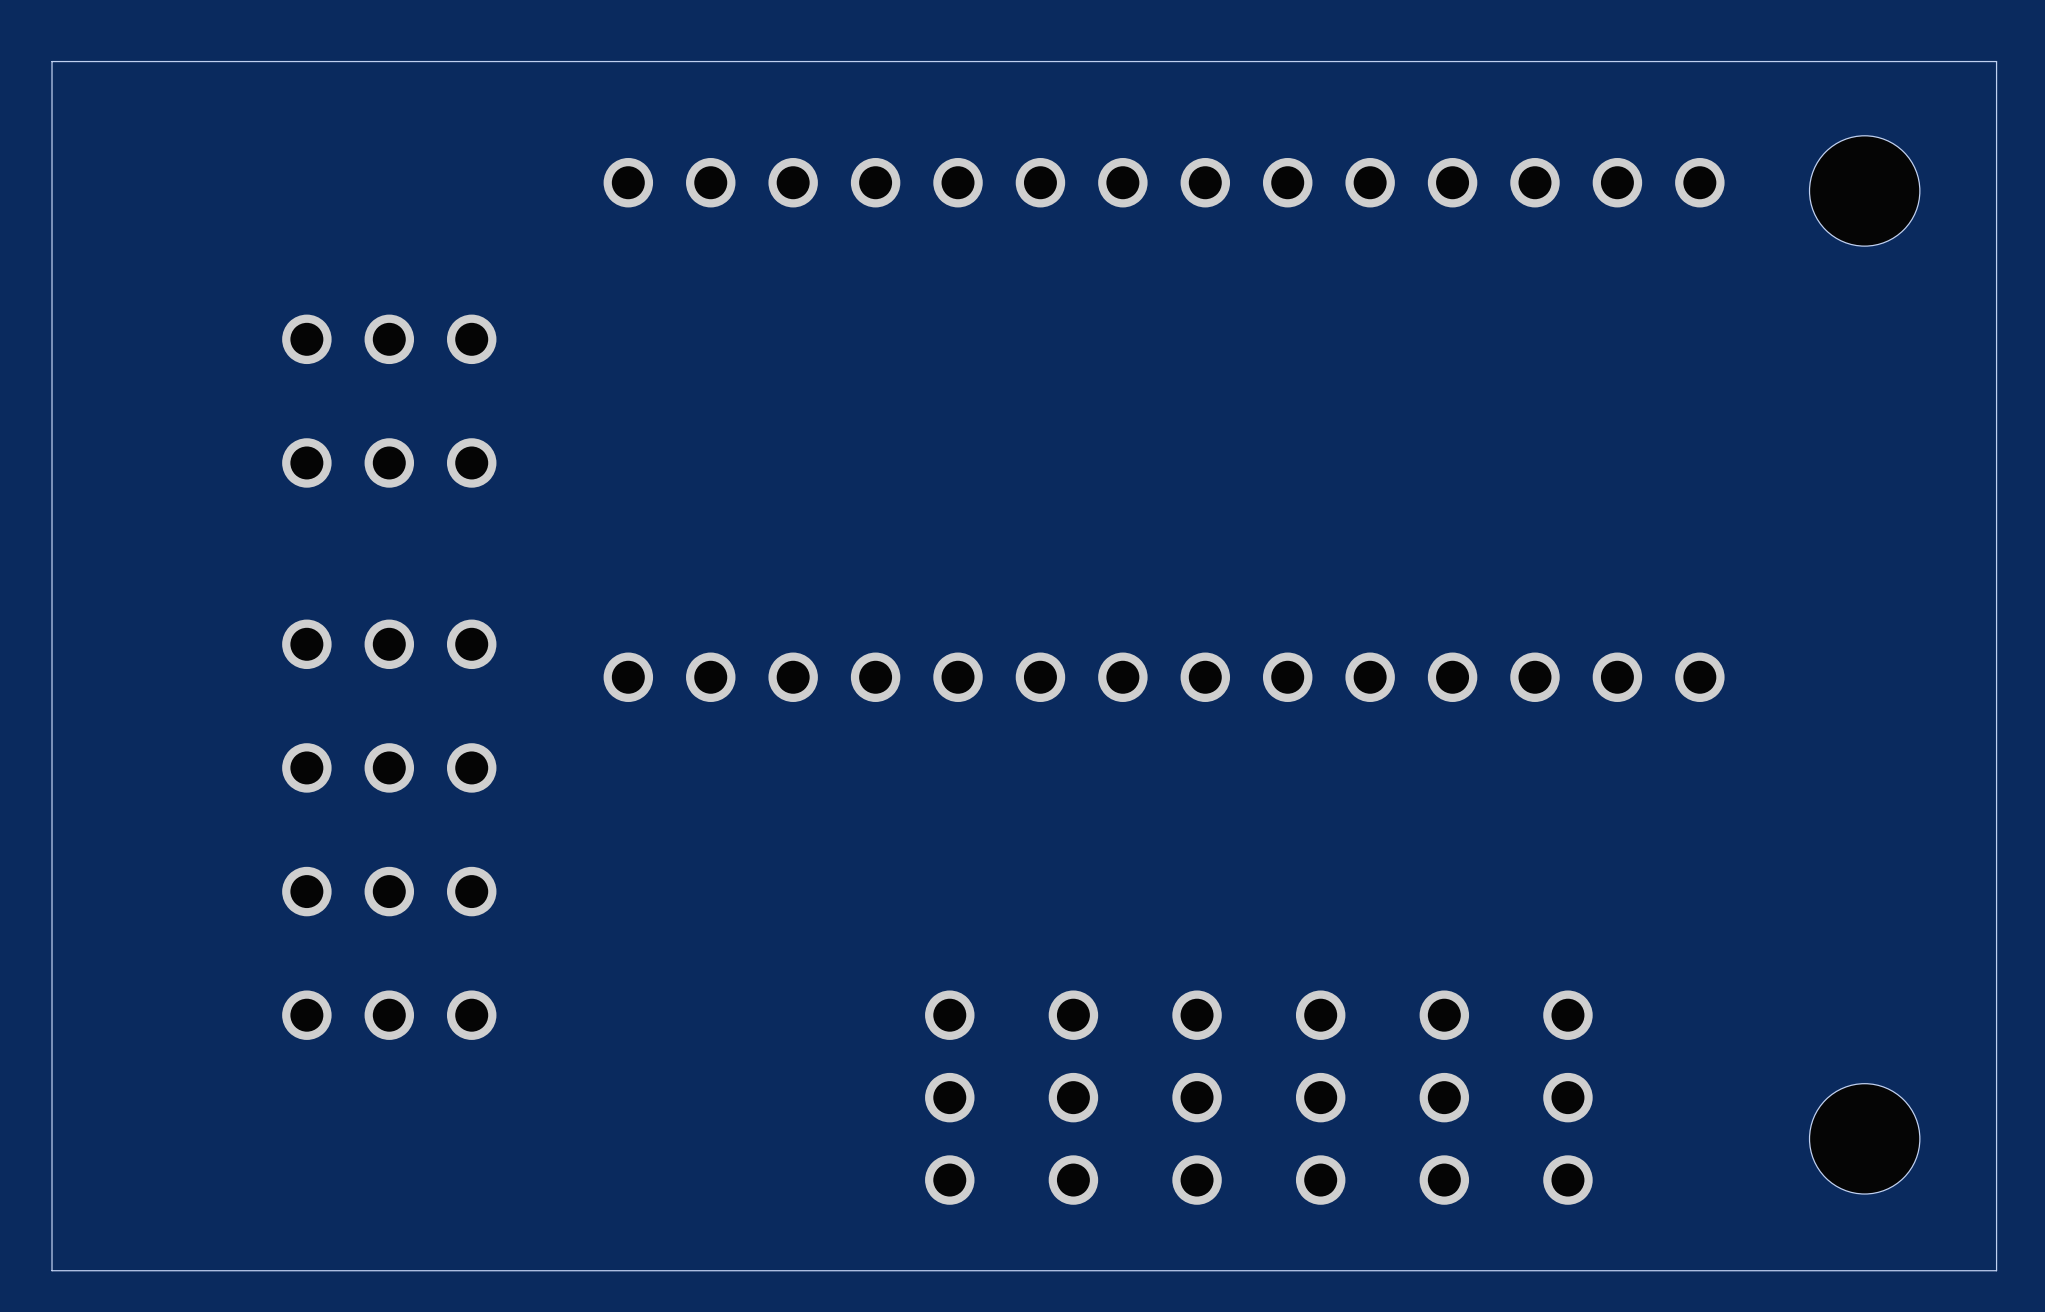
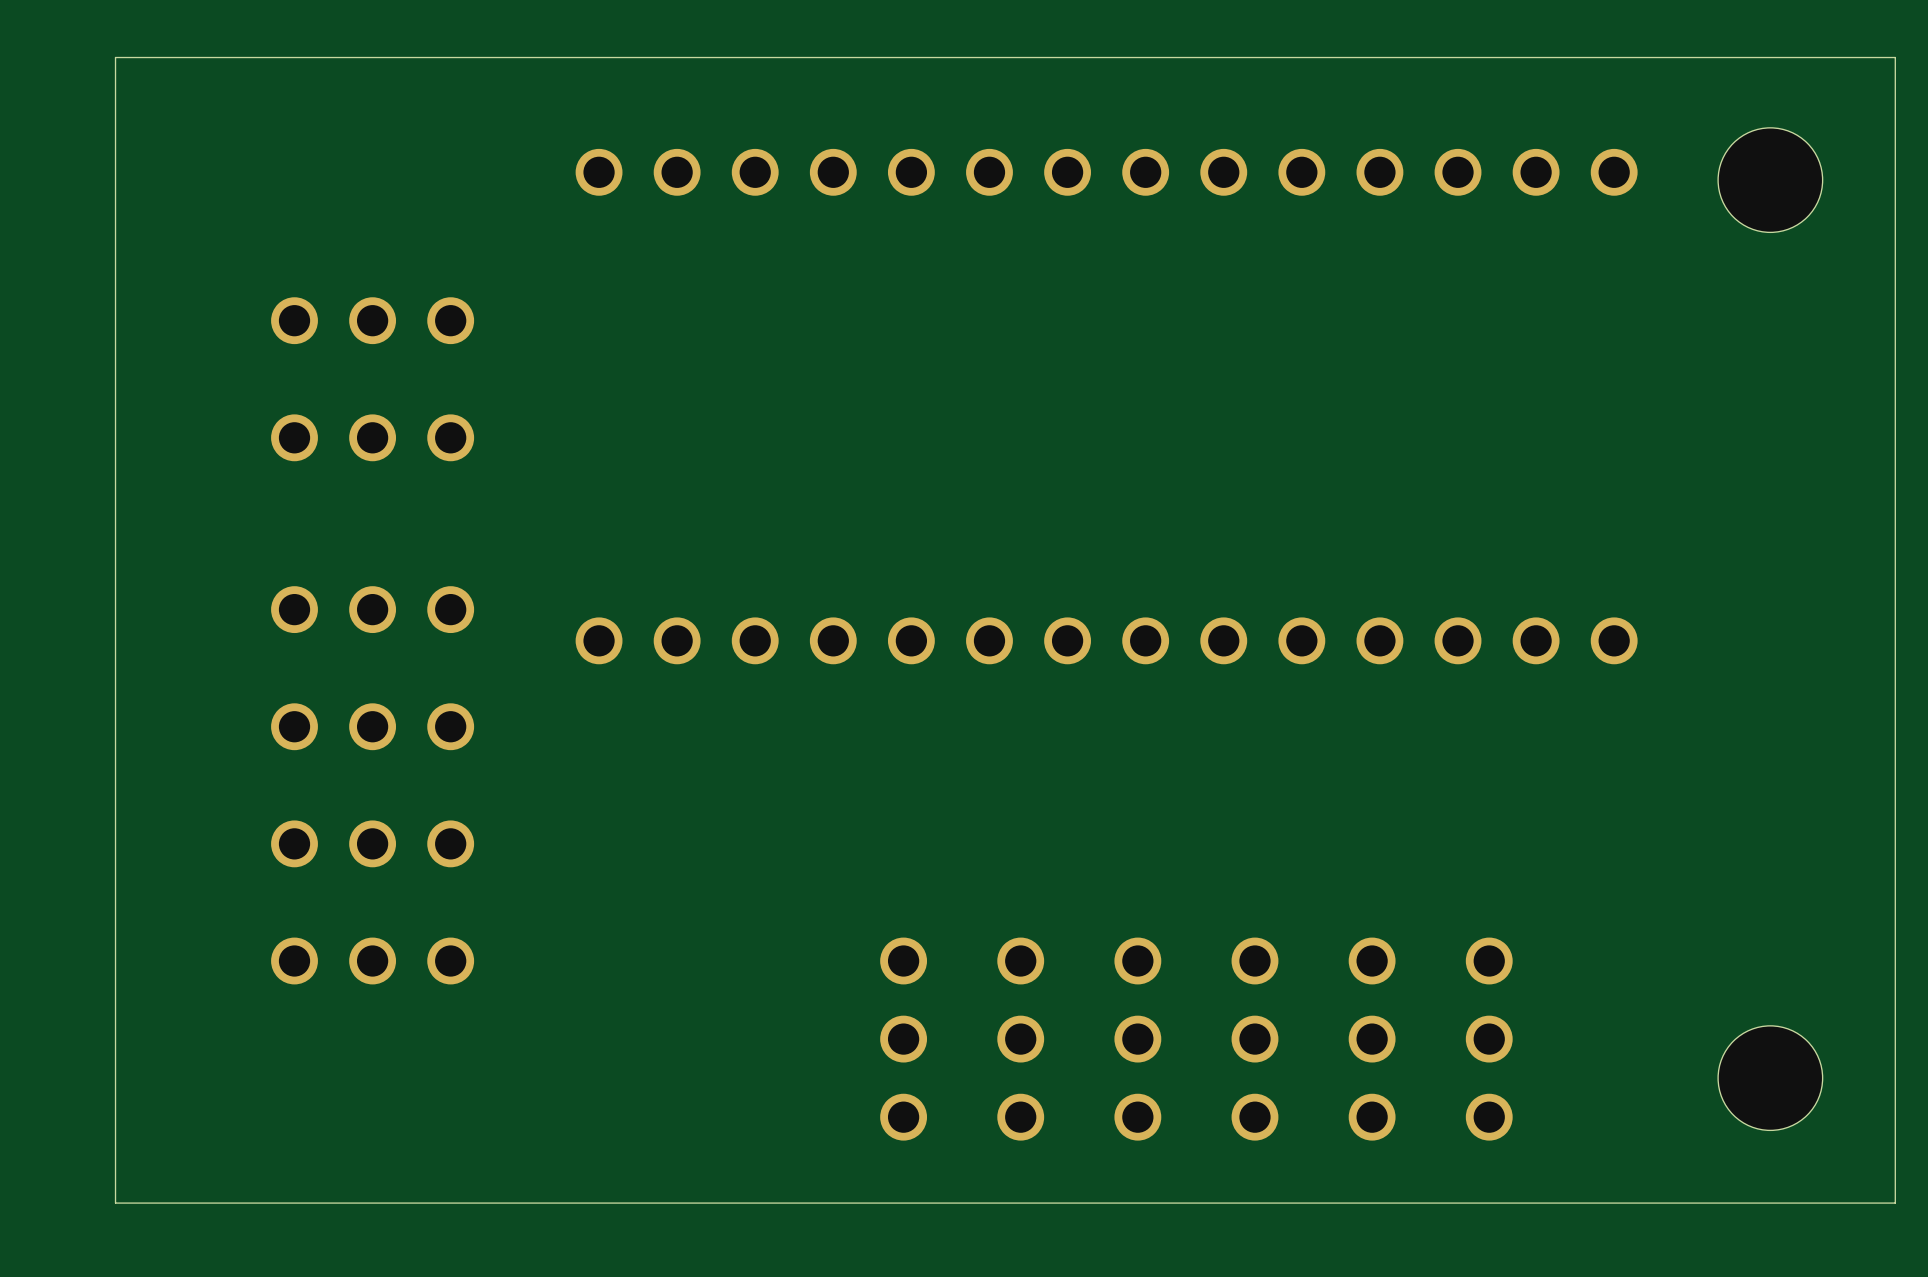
board edge: (117, 61) (52, 61) (52, 1270) (117, 1270) -> (115, 57) (115, 1203)

